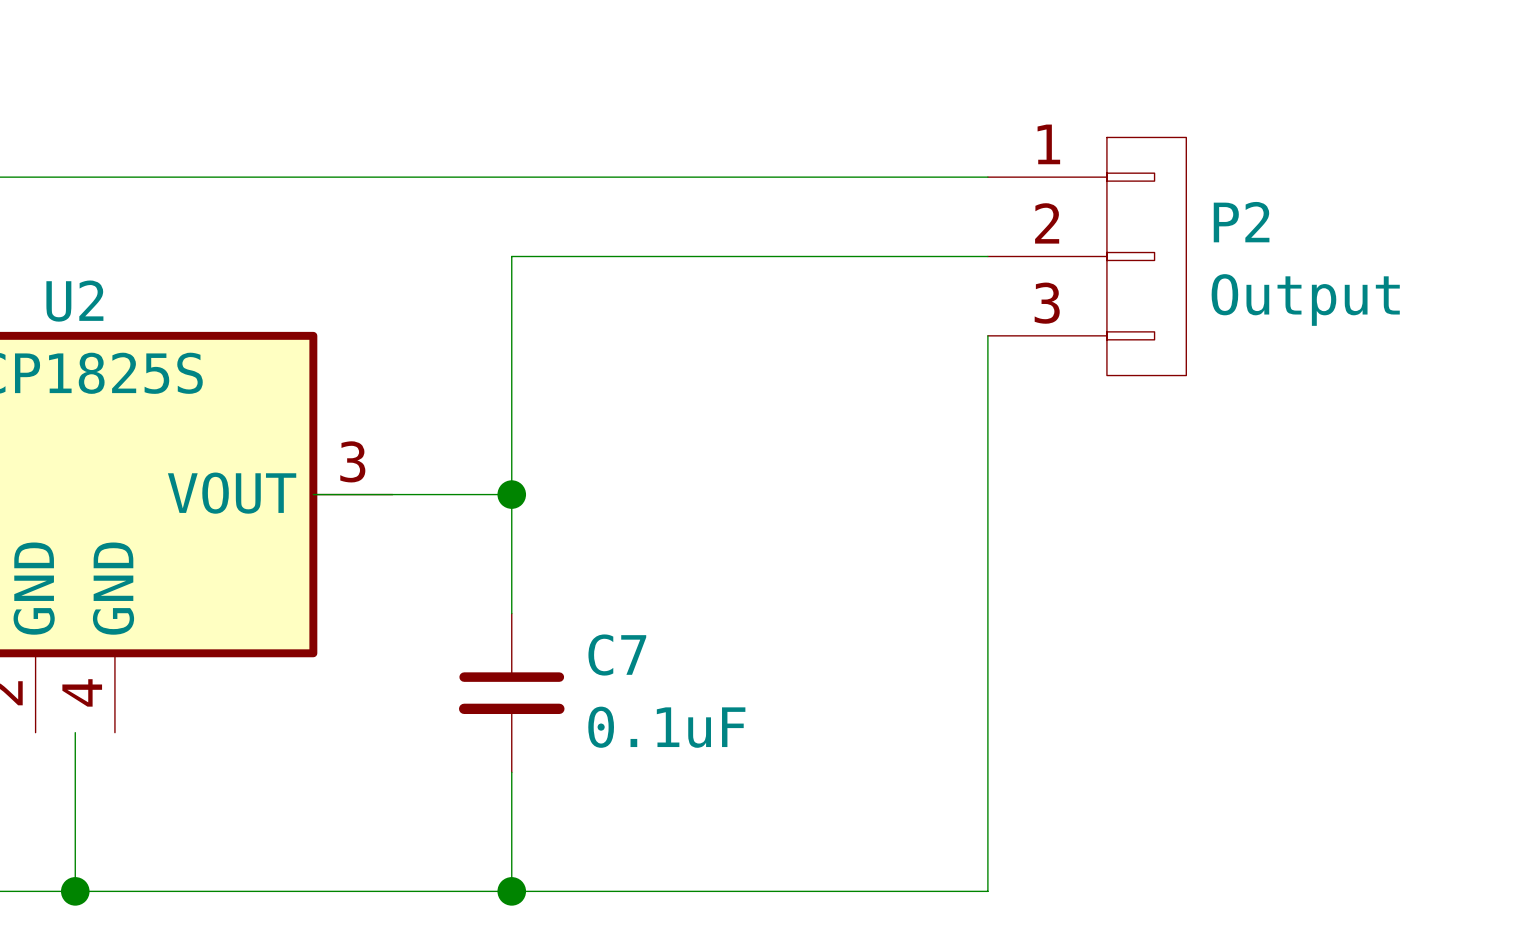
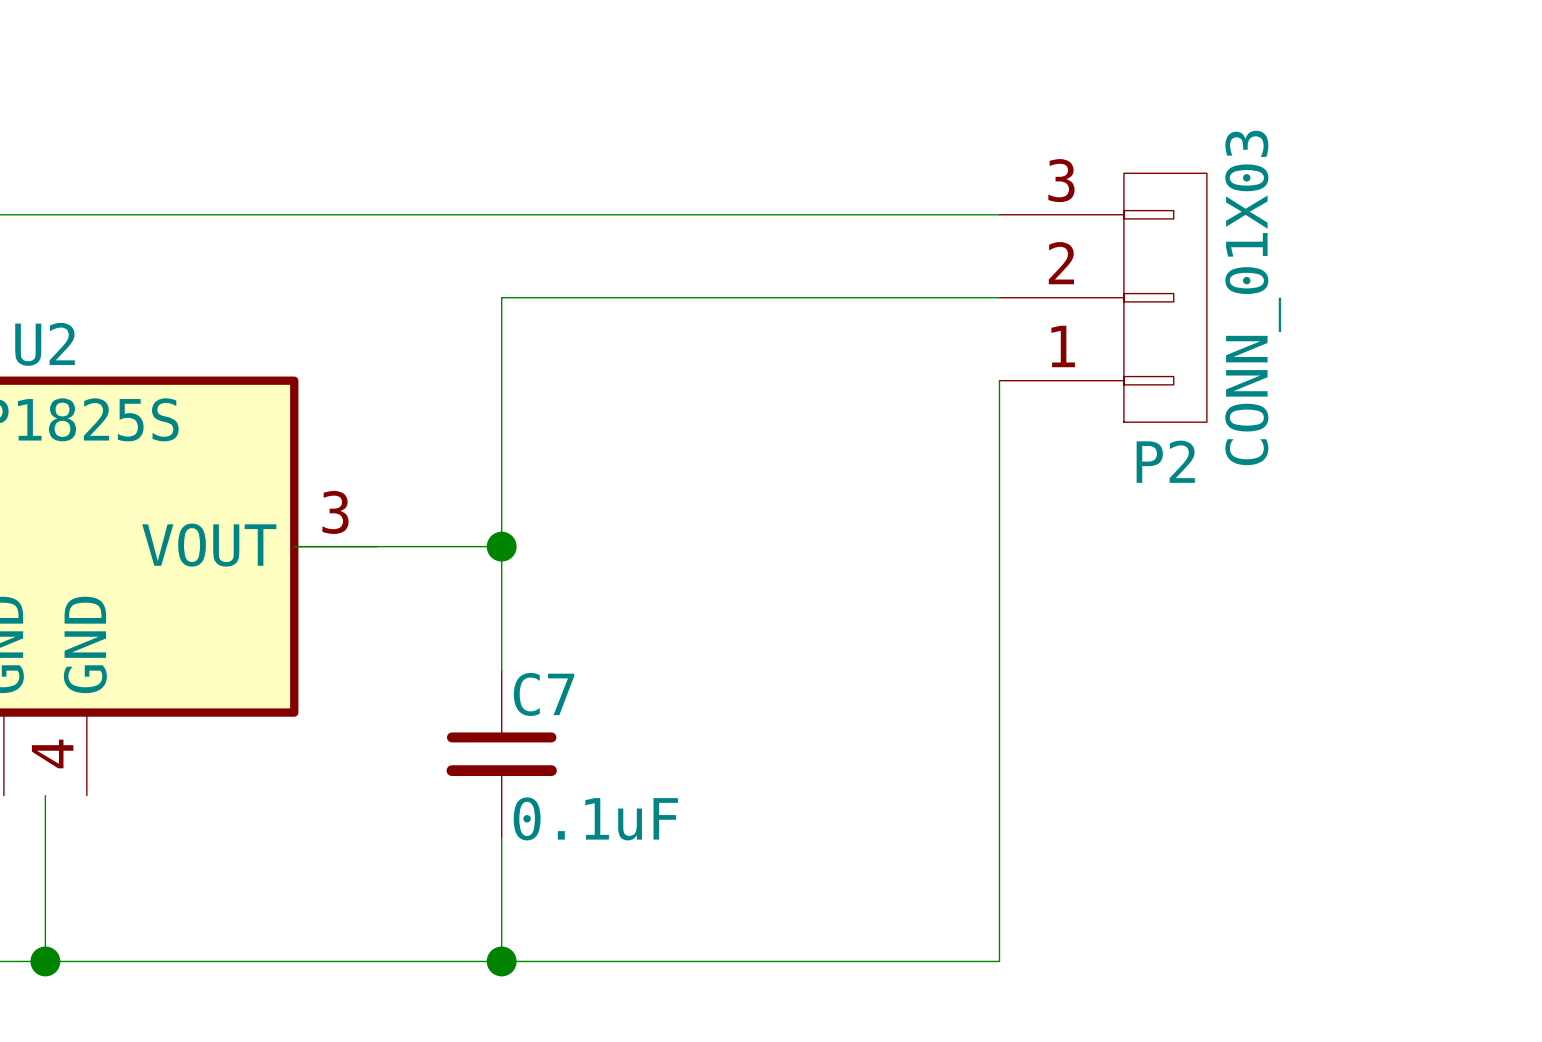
P2 name position: P2 (1241, 222) -> P2 (1165, 461)
P2 flip: as is (1146, 256) -> up-down (1165, 297)
P2 value: Output (1305, 299) -> CONN_01X03 (1253, 297)
C7 name position: C7 (617, 655) -> C7 (544, 694)
C7 value position: 0.1uF (666, 727) -> 0.1uF (595, 818)

